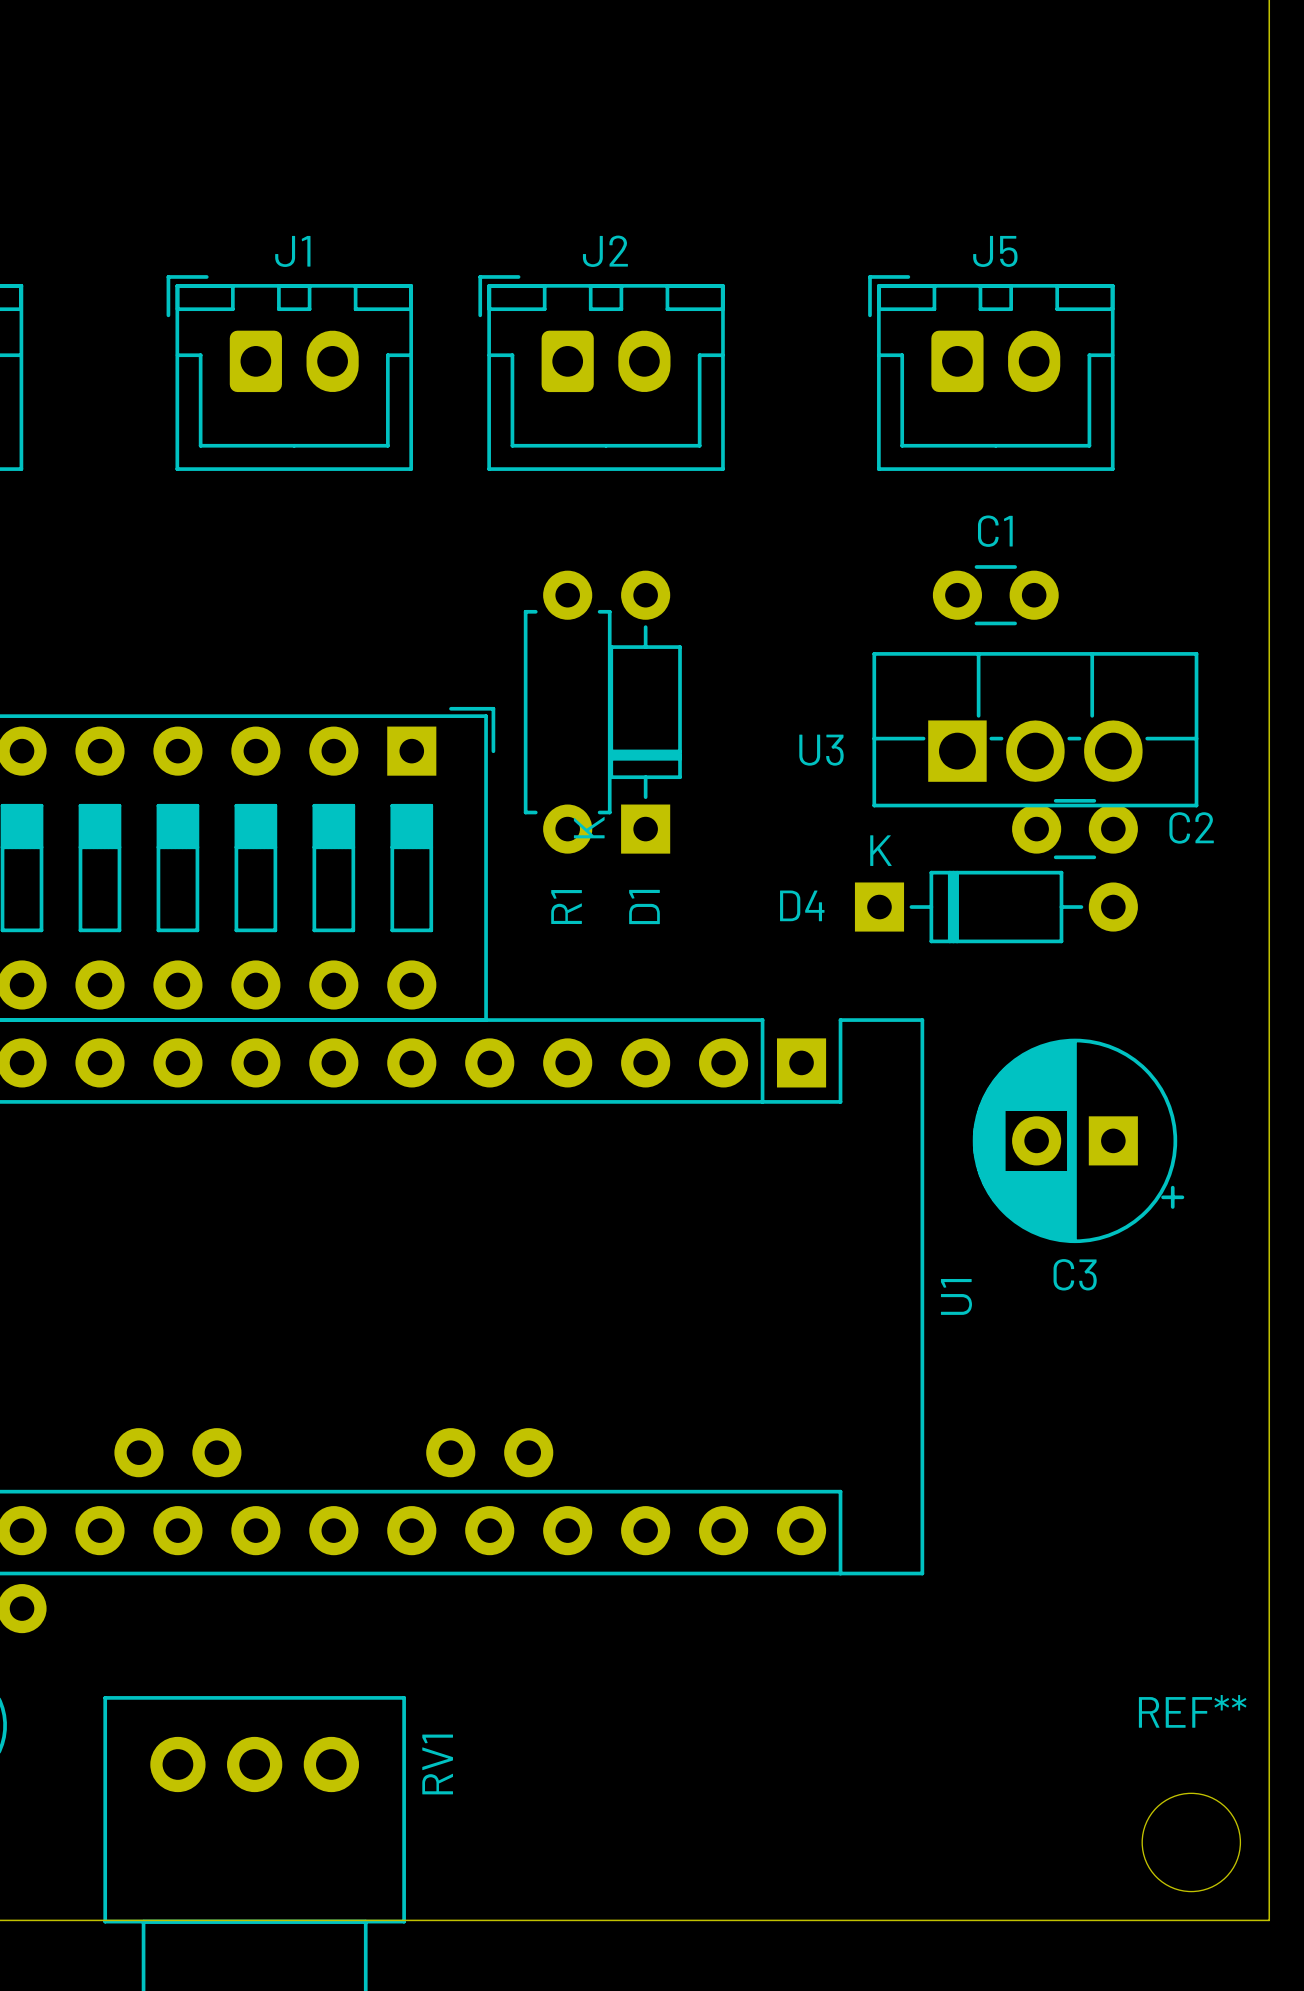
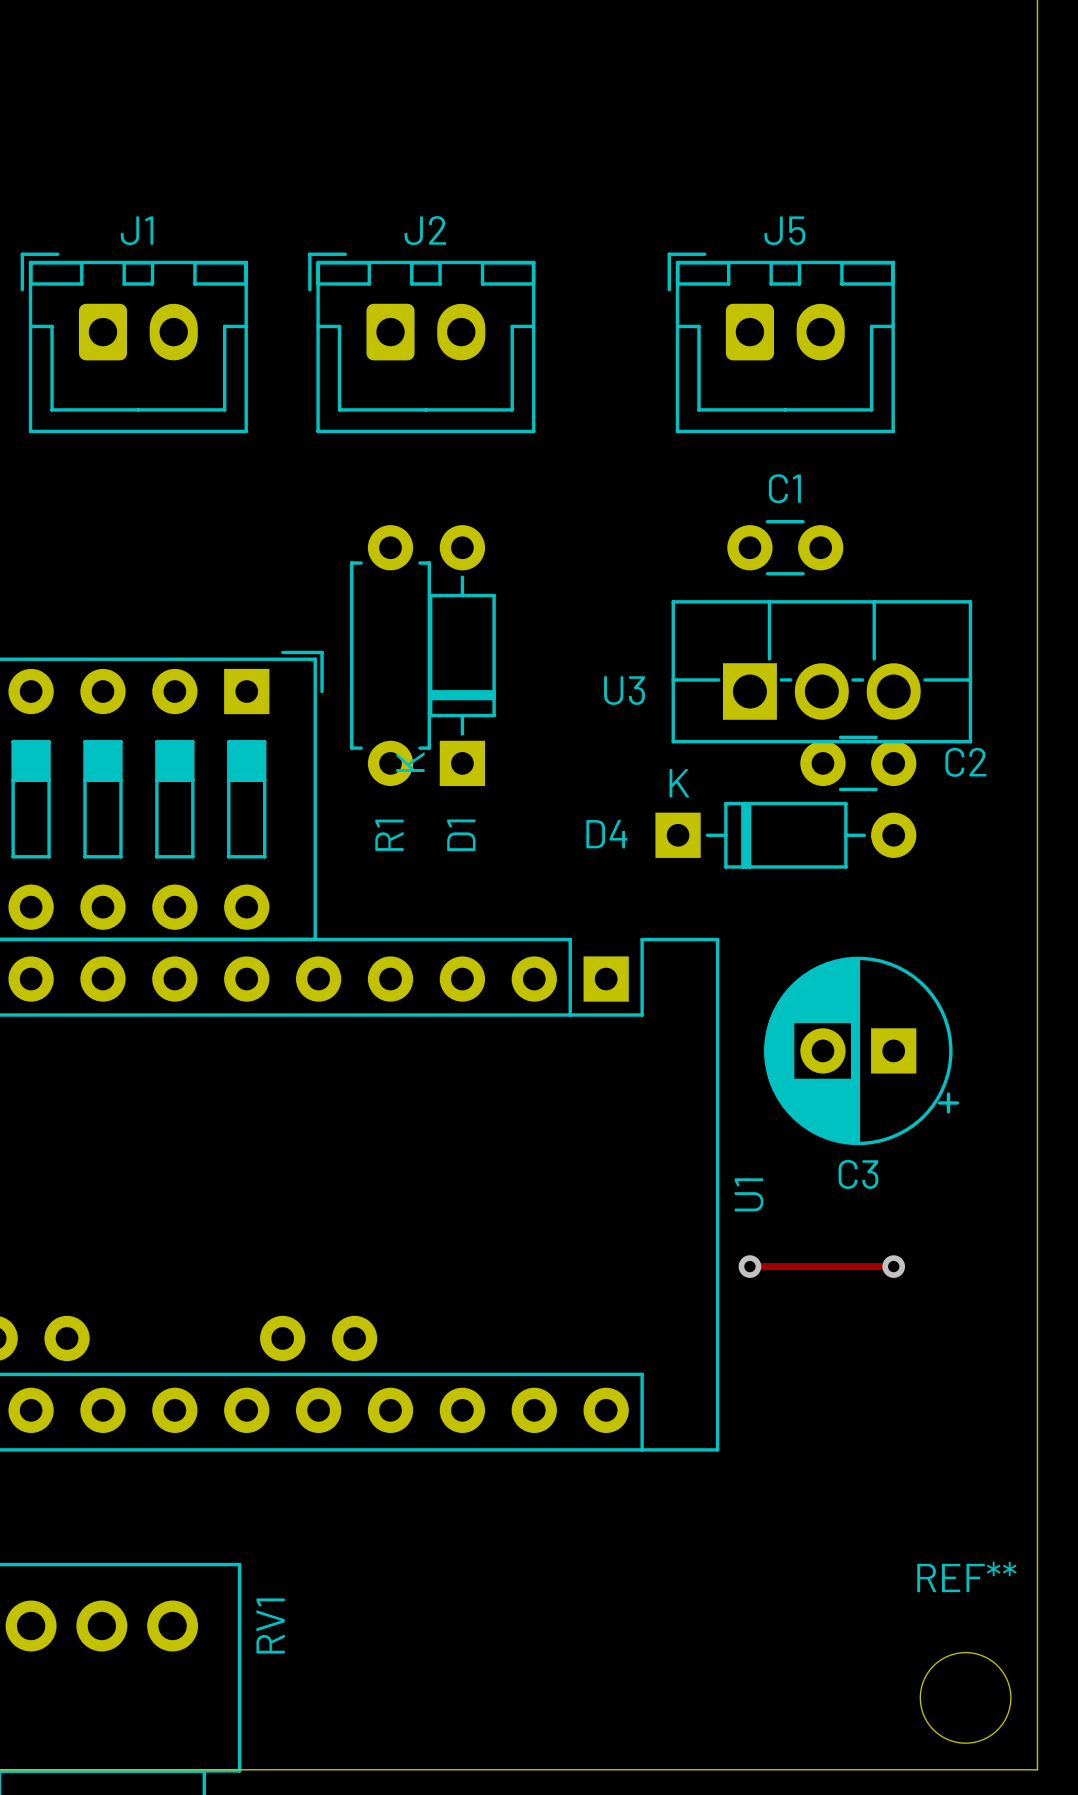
track: none -> (749, 1266) (893, 1266)
via: none -> (749, 1266)
via: none -> (893, 1266)

